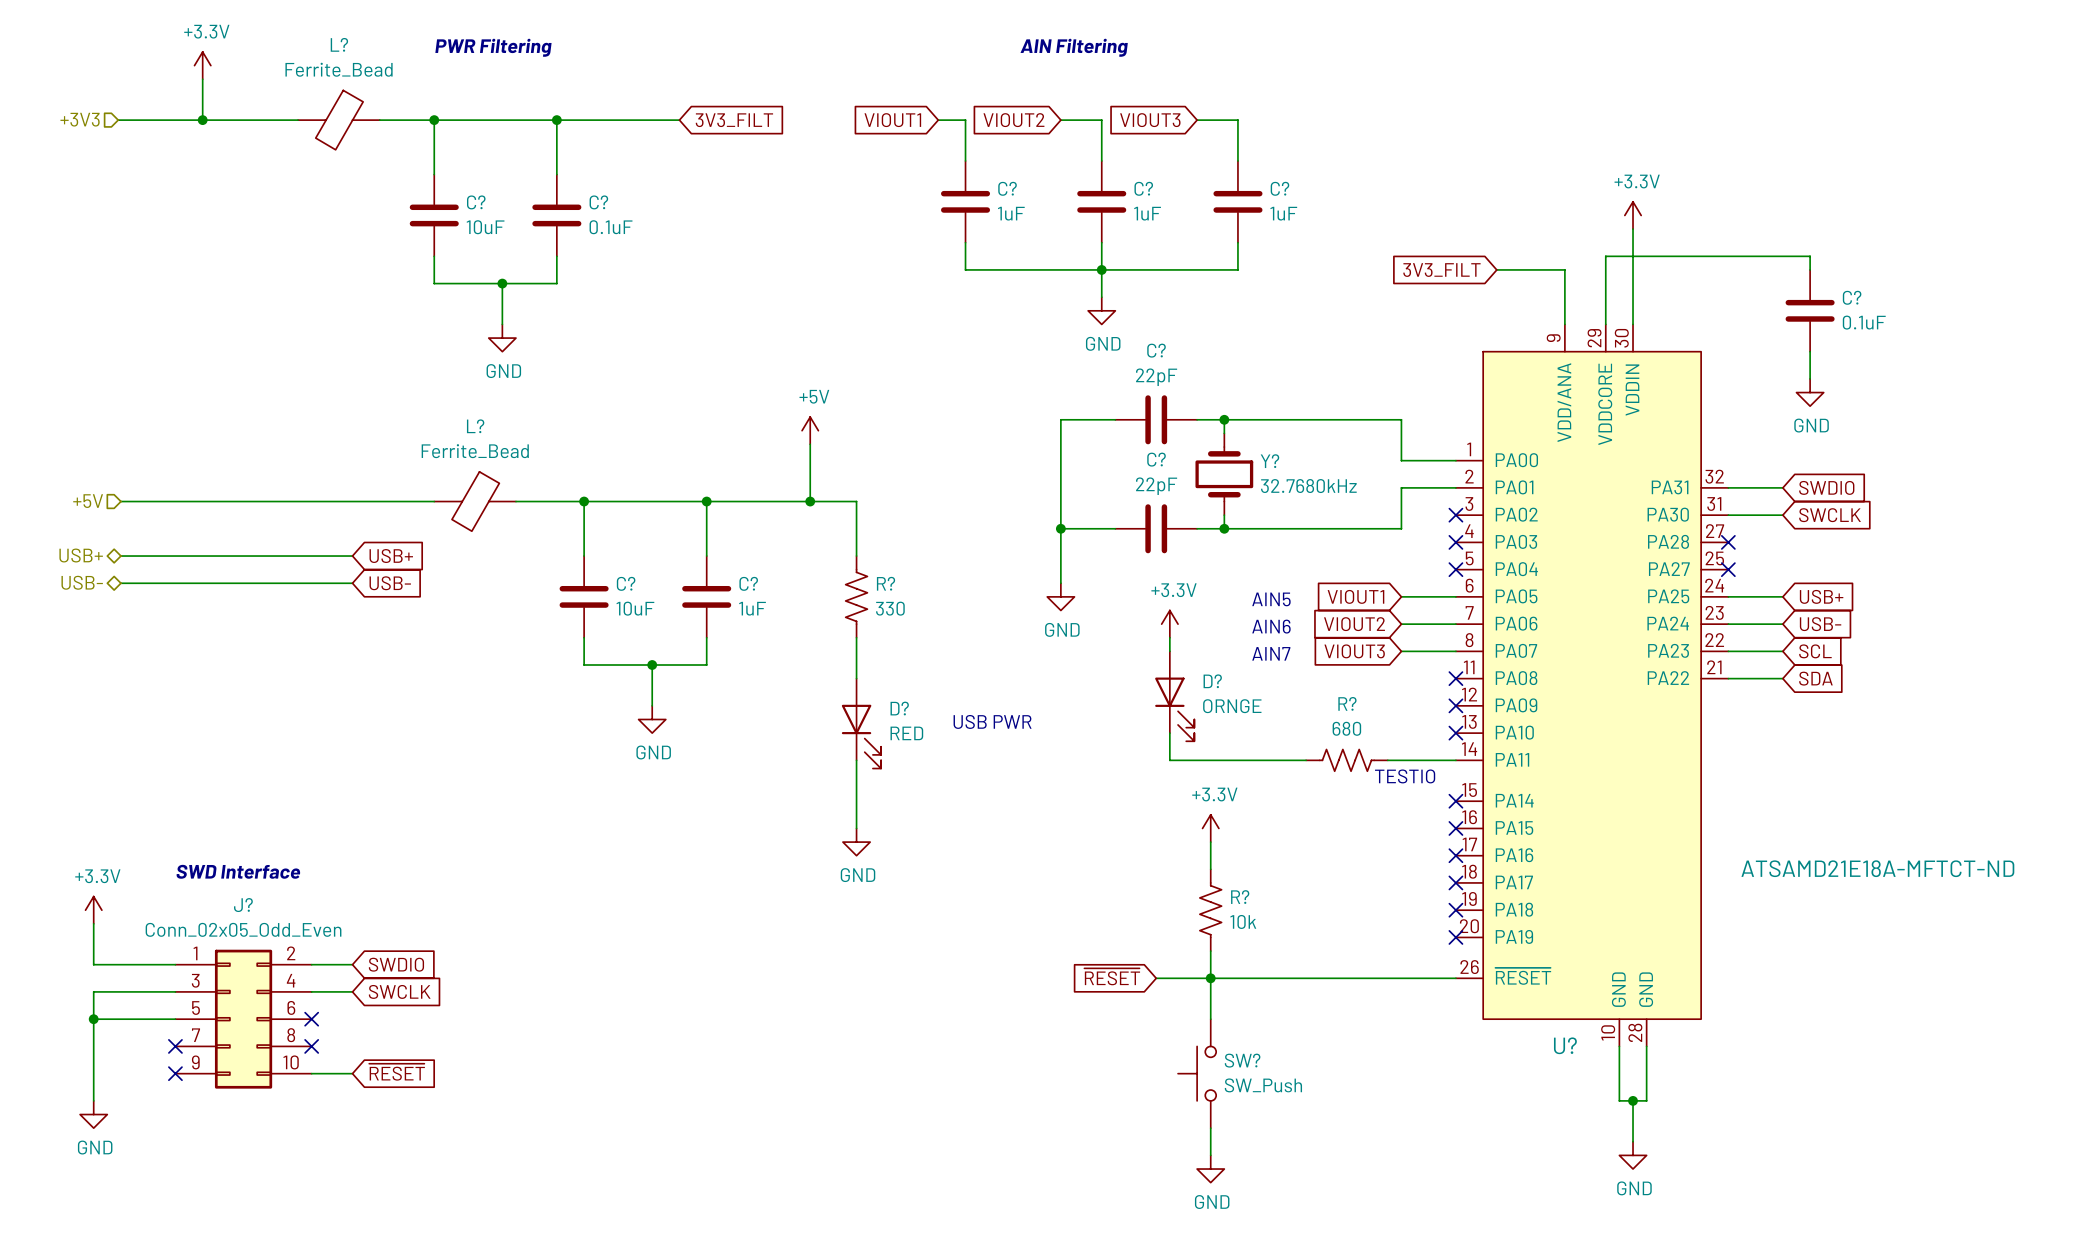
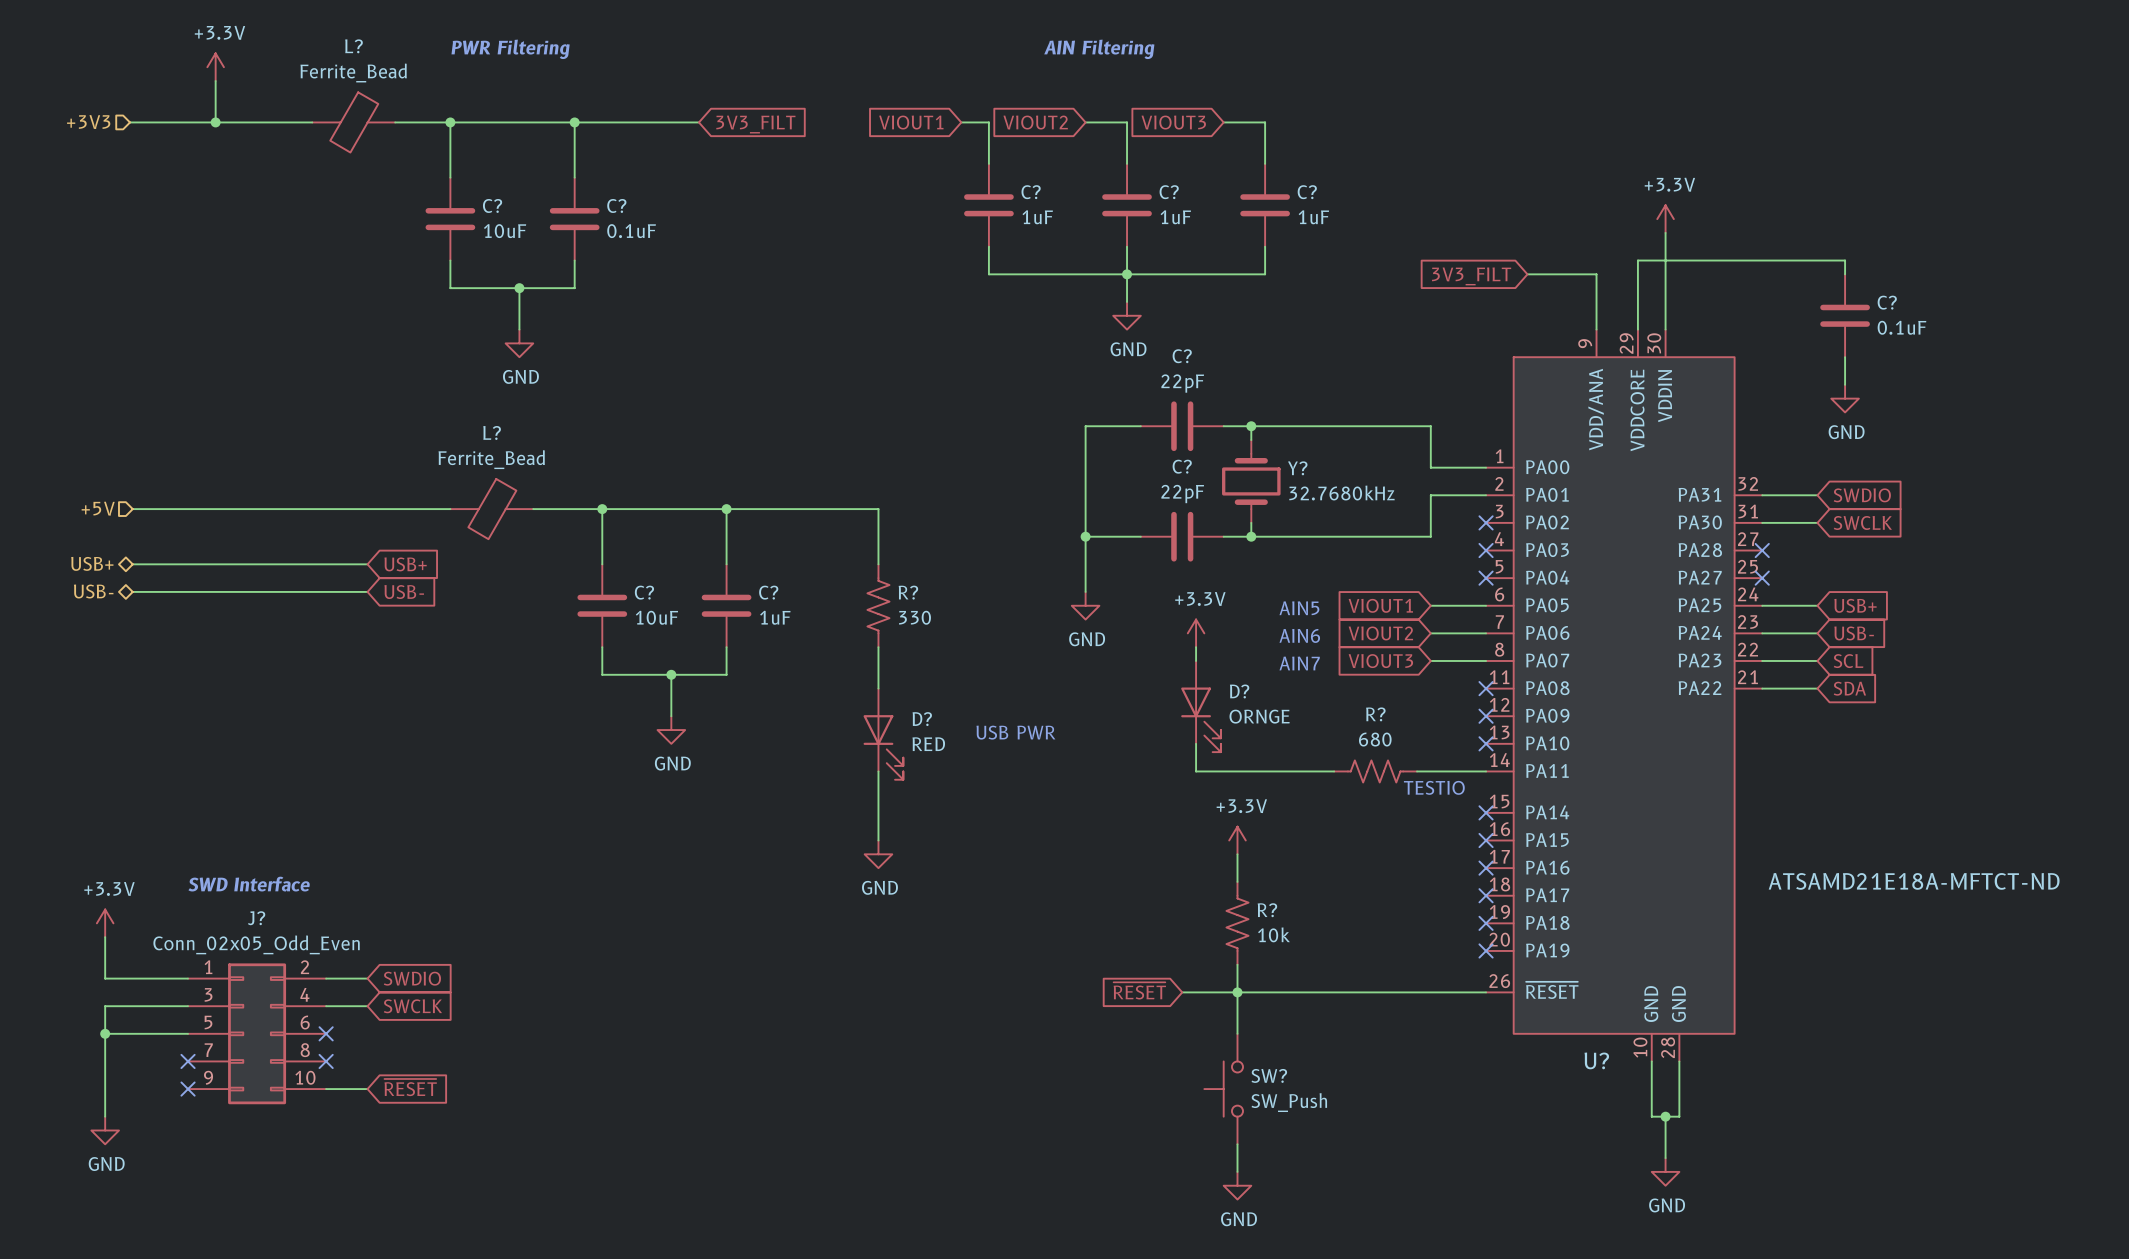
power symbol: +5V (810, 430) -> none
wire: (810, 444) (810, 501) -> none
junction: (810, 501) -> none

